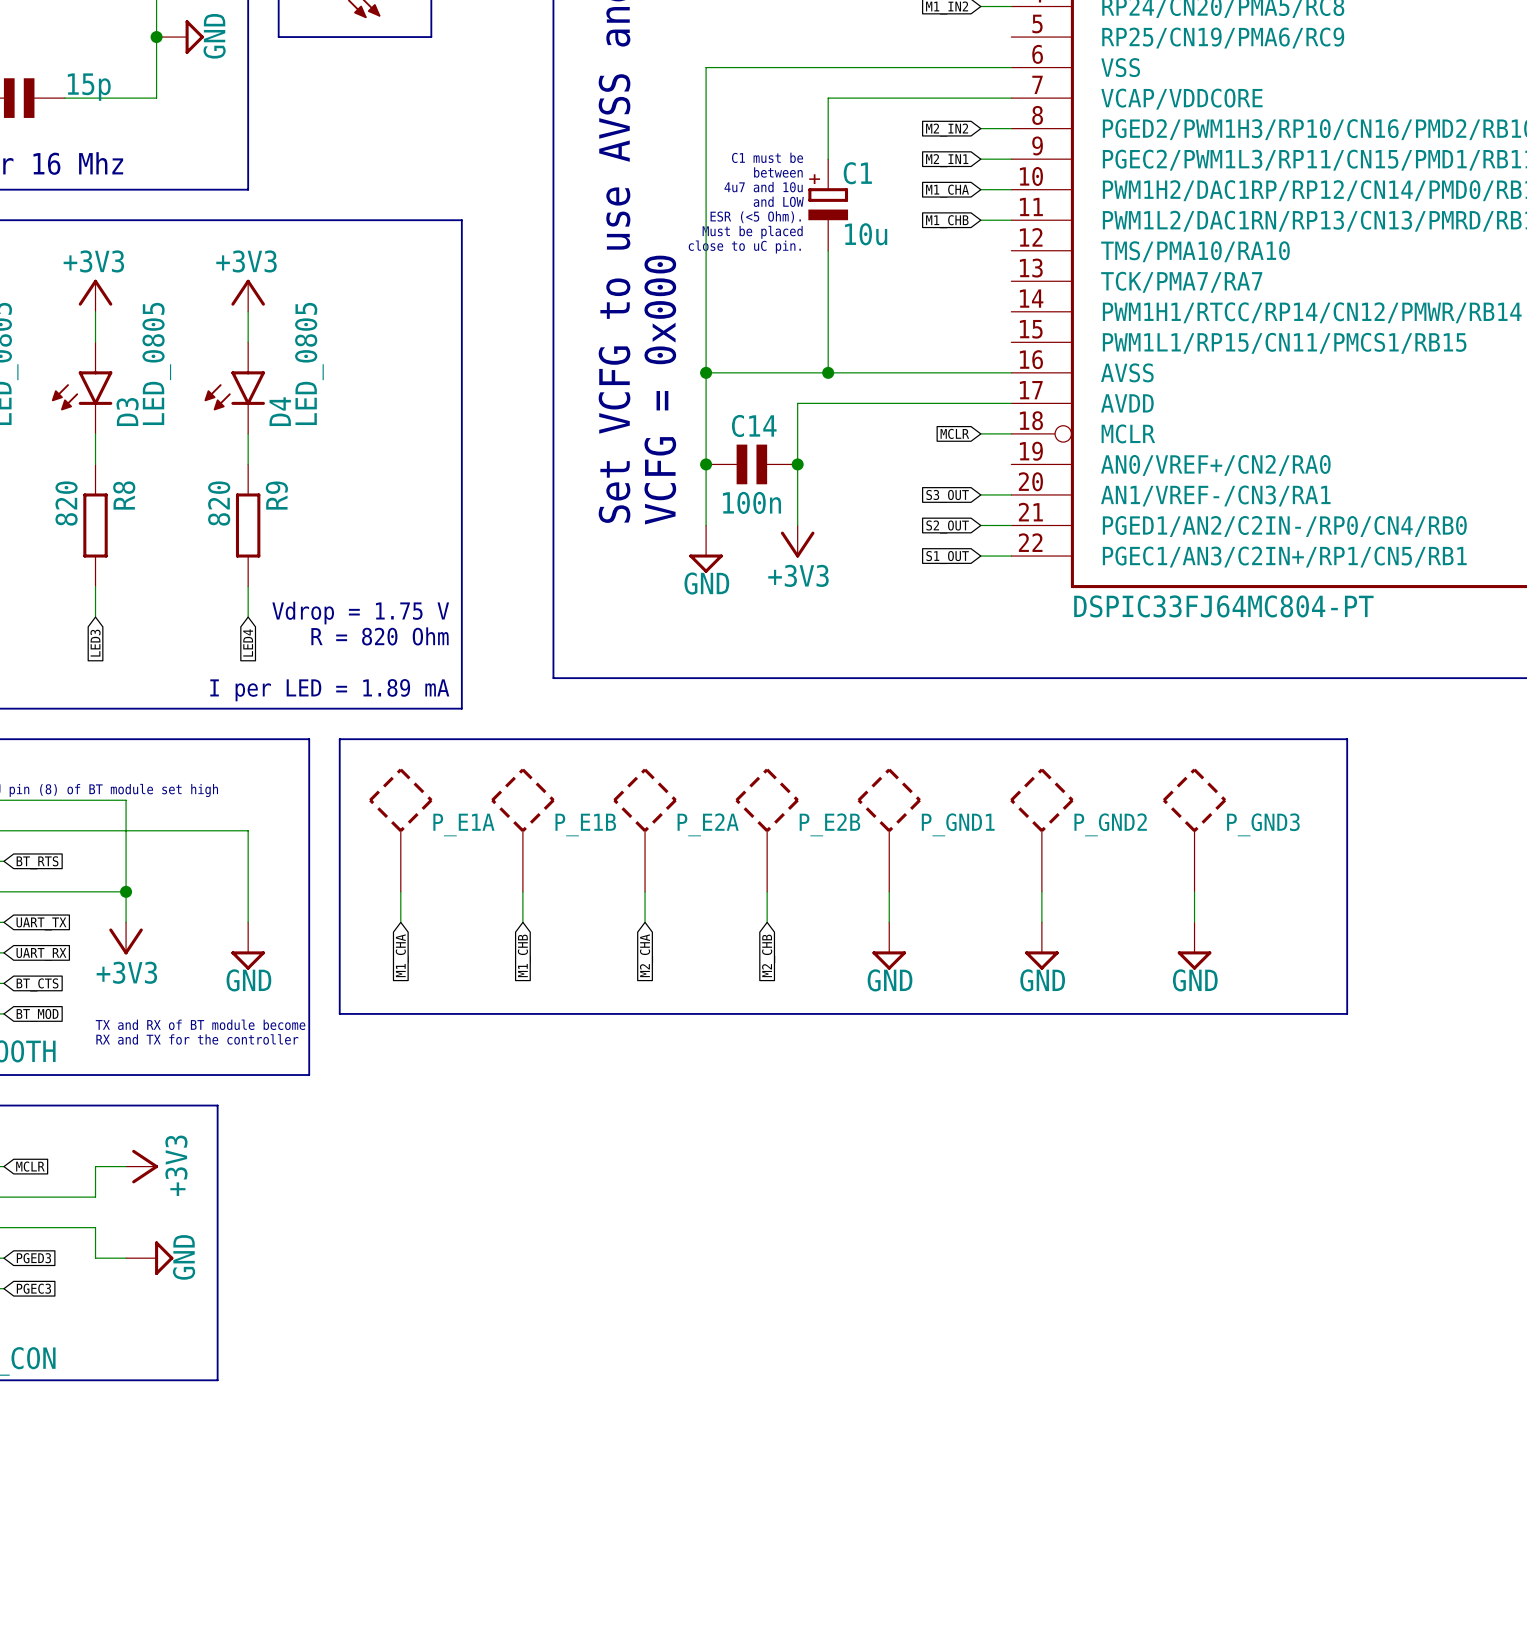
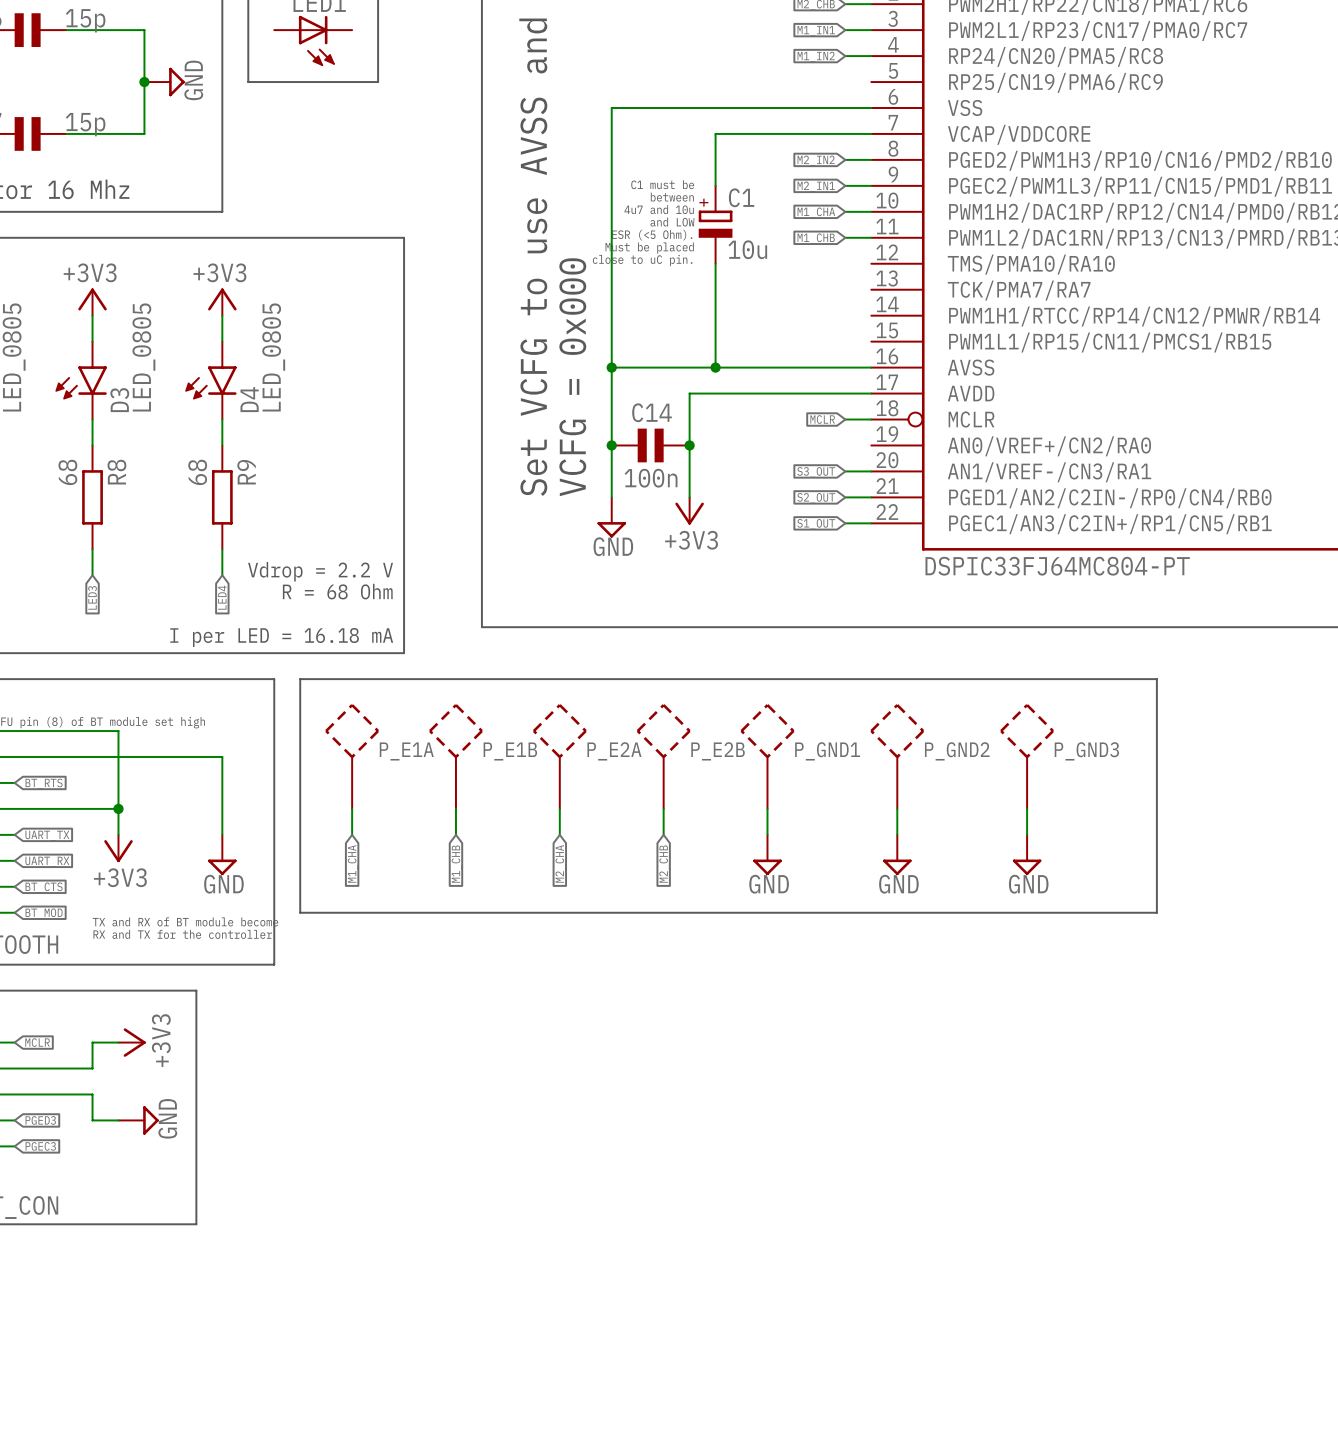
R8 value: 820 (66, 503) -> 68 (67, 472)
R9 value: 820 (219, 503) -> 68 (197, 472)
text: Vdrop = 1.75 V (360, 613) -> Vdrop = 2.2 V (320, 571)
text: R = 820 Ohm (379, 636) -> R = 68 Ohm (337, 591)
text: I per LED = 1.89 mA (329, 690) -> I per LED = 16.18 mA (281, 637)

